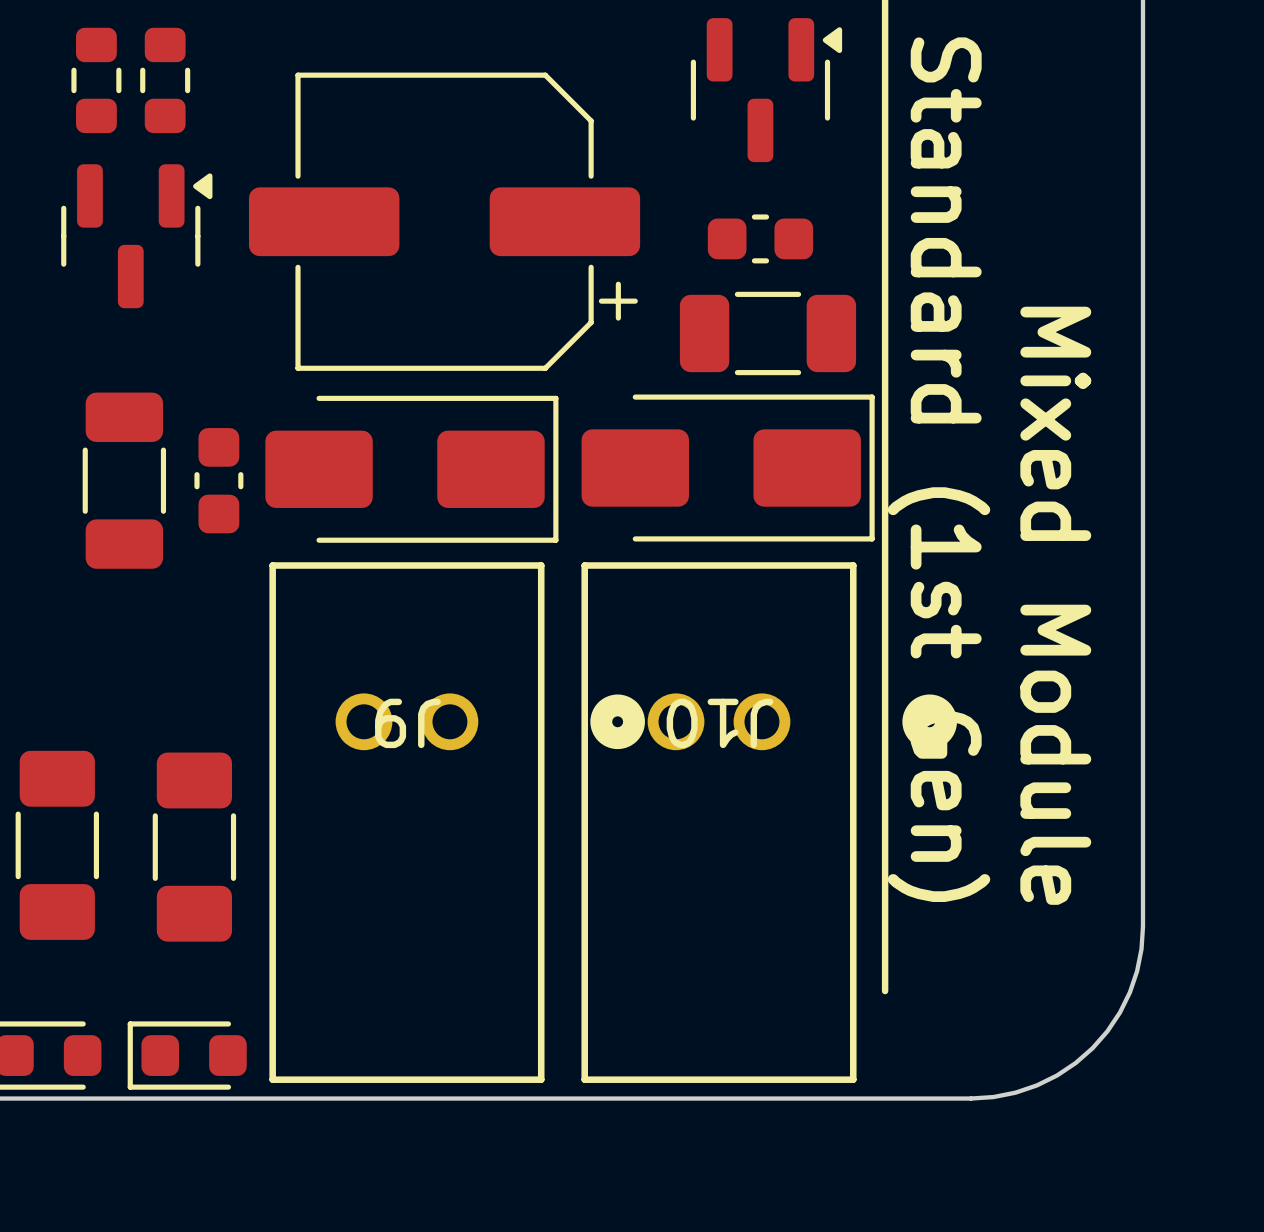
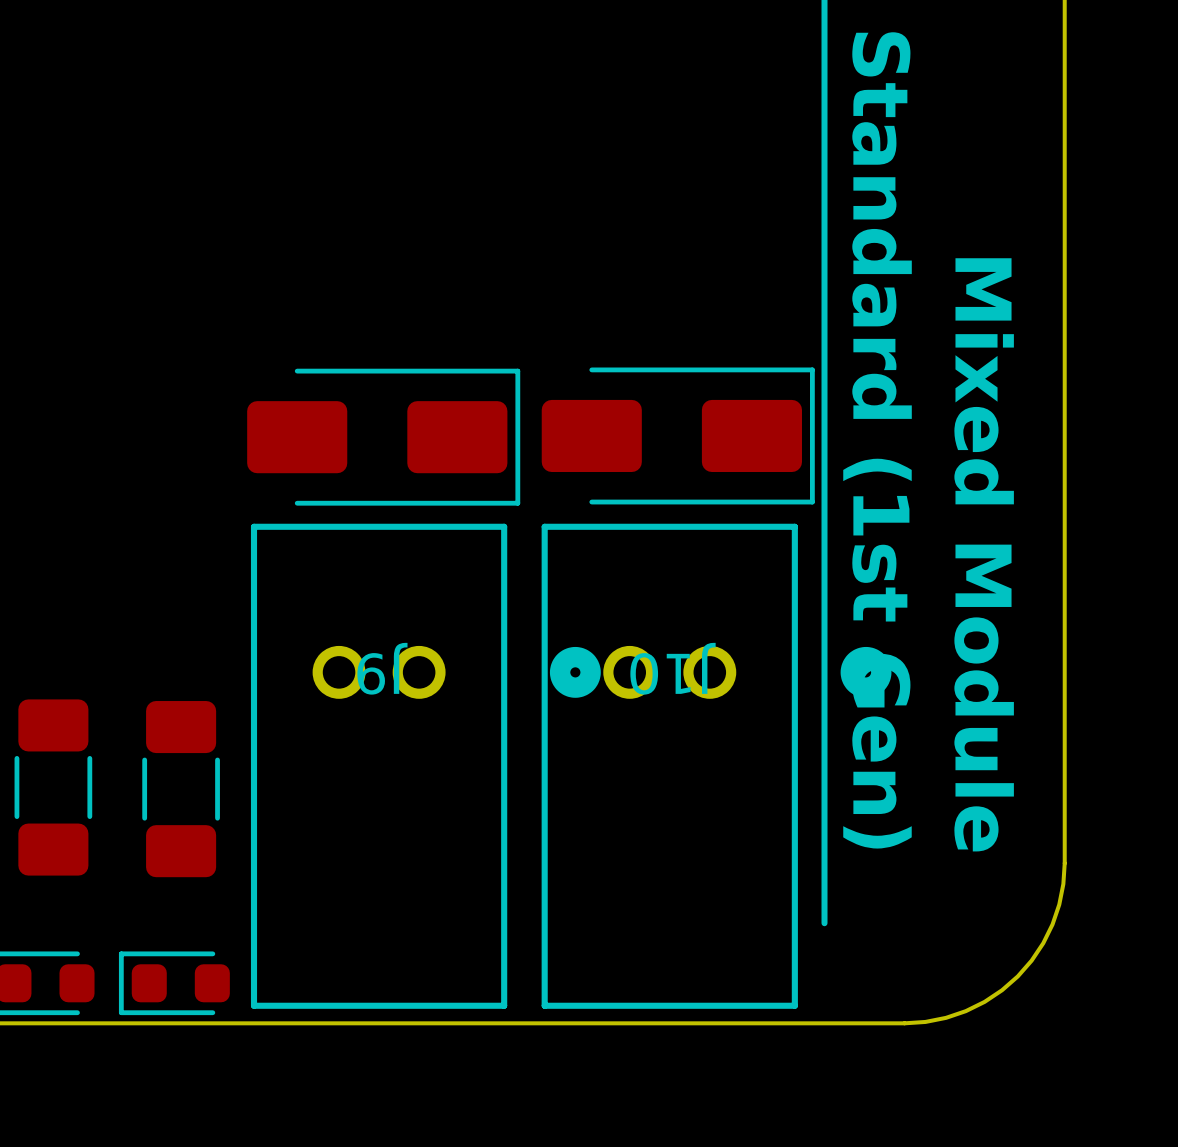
part: (96, 80) -> none
part: (165, 80) -> none
part: (766, 90) -> none
part: (444, 221) -> none
part: (136, 236) -> none
part: (760, 238) -> none
part: (767, 333) -> none
part: (124, 480) -> none
part: (218, 480) -> none

